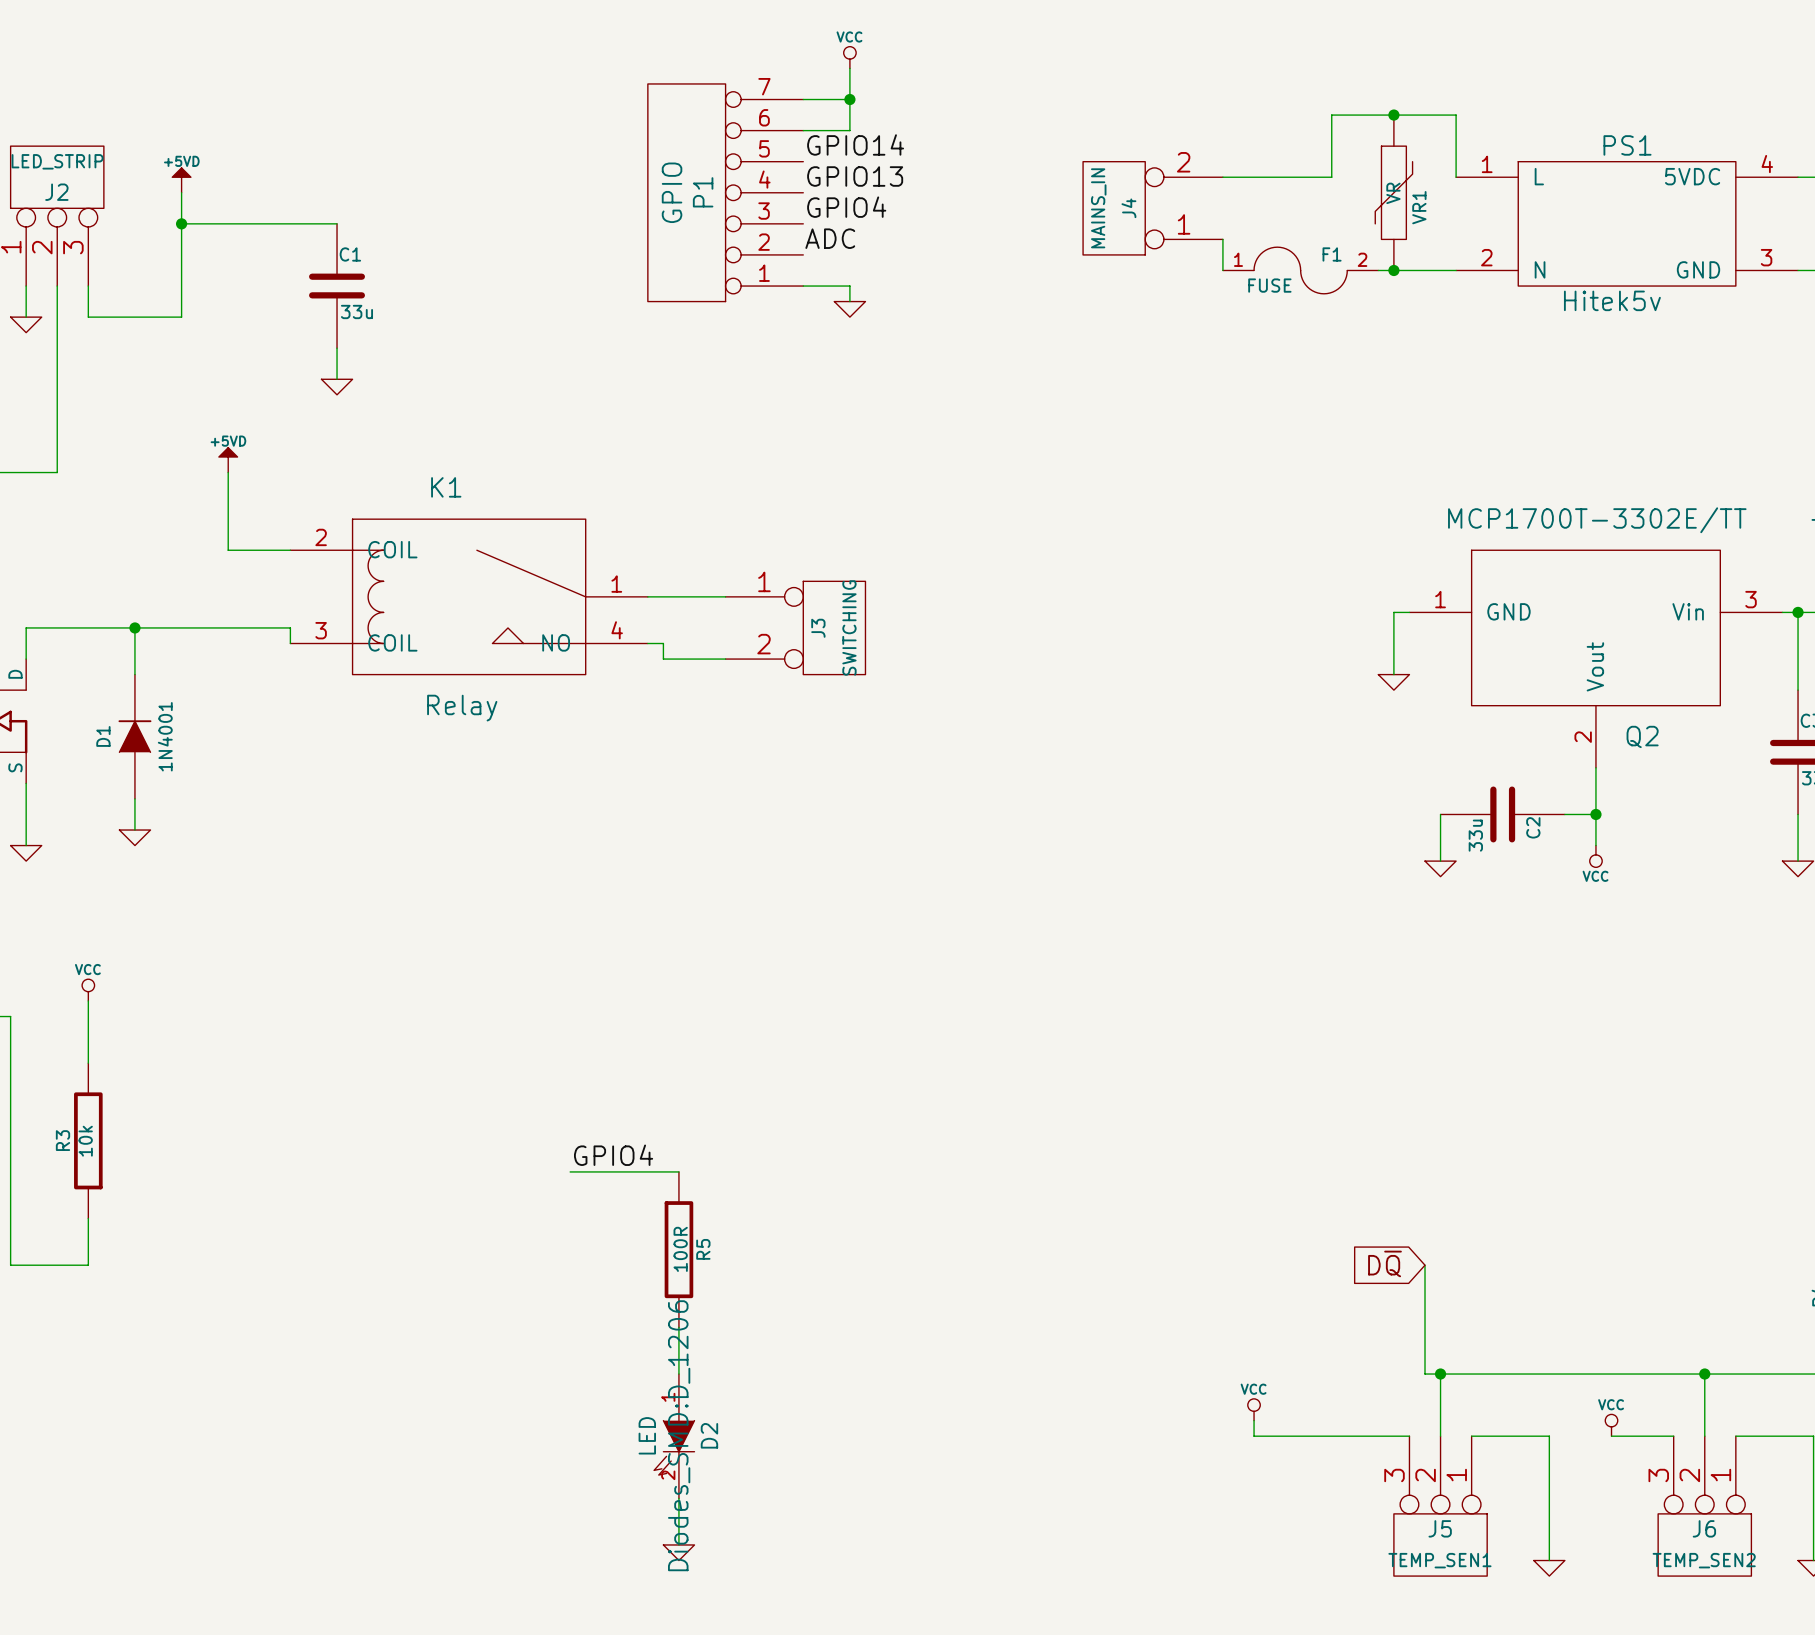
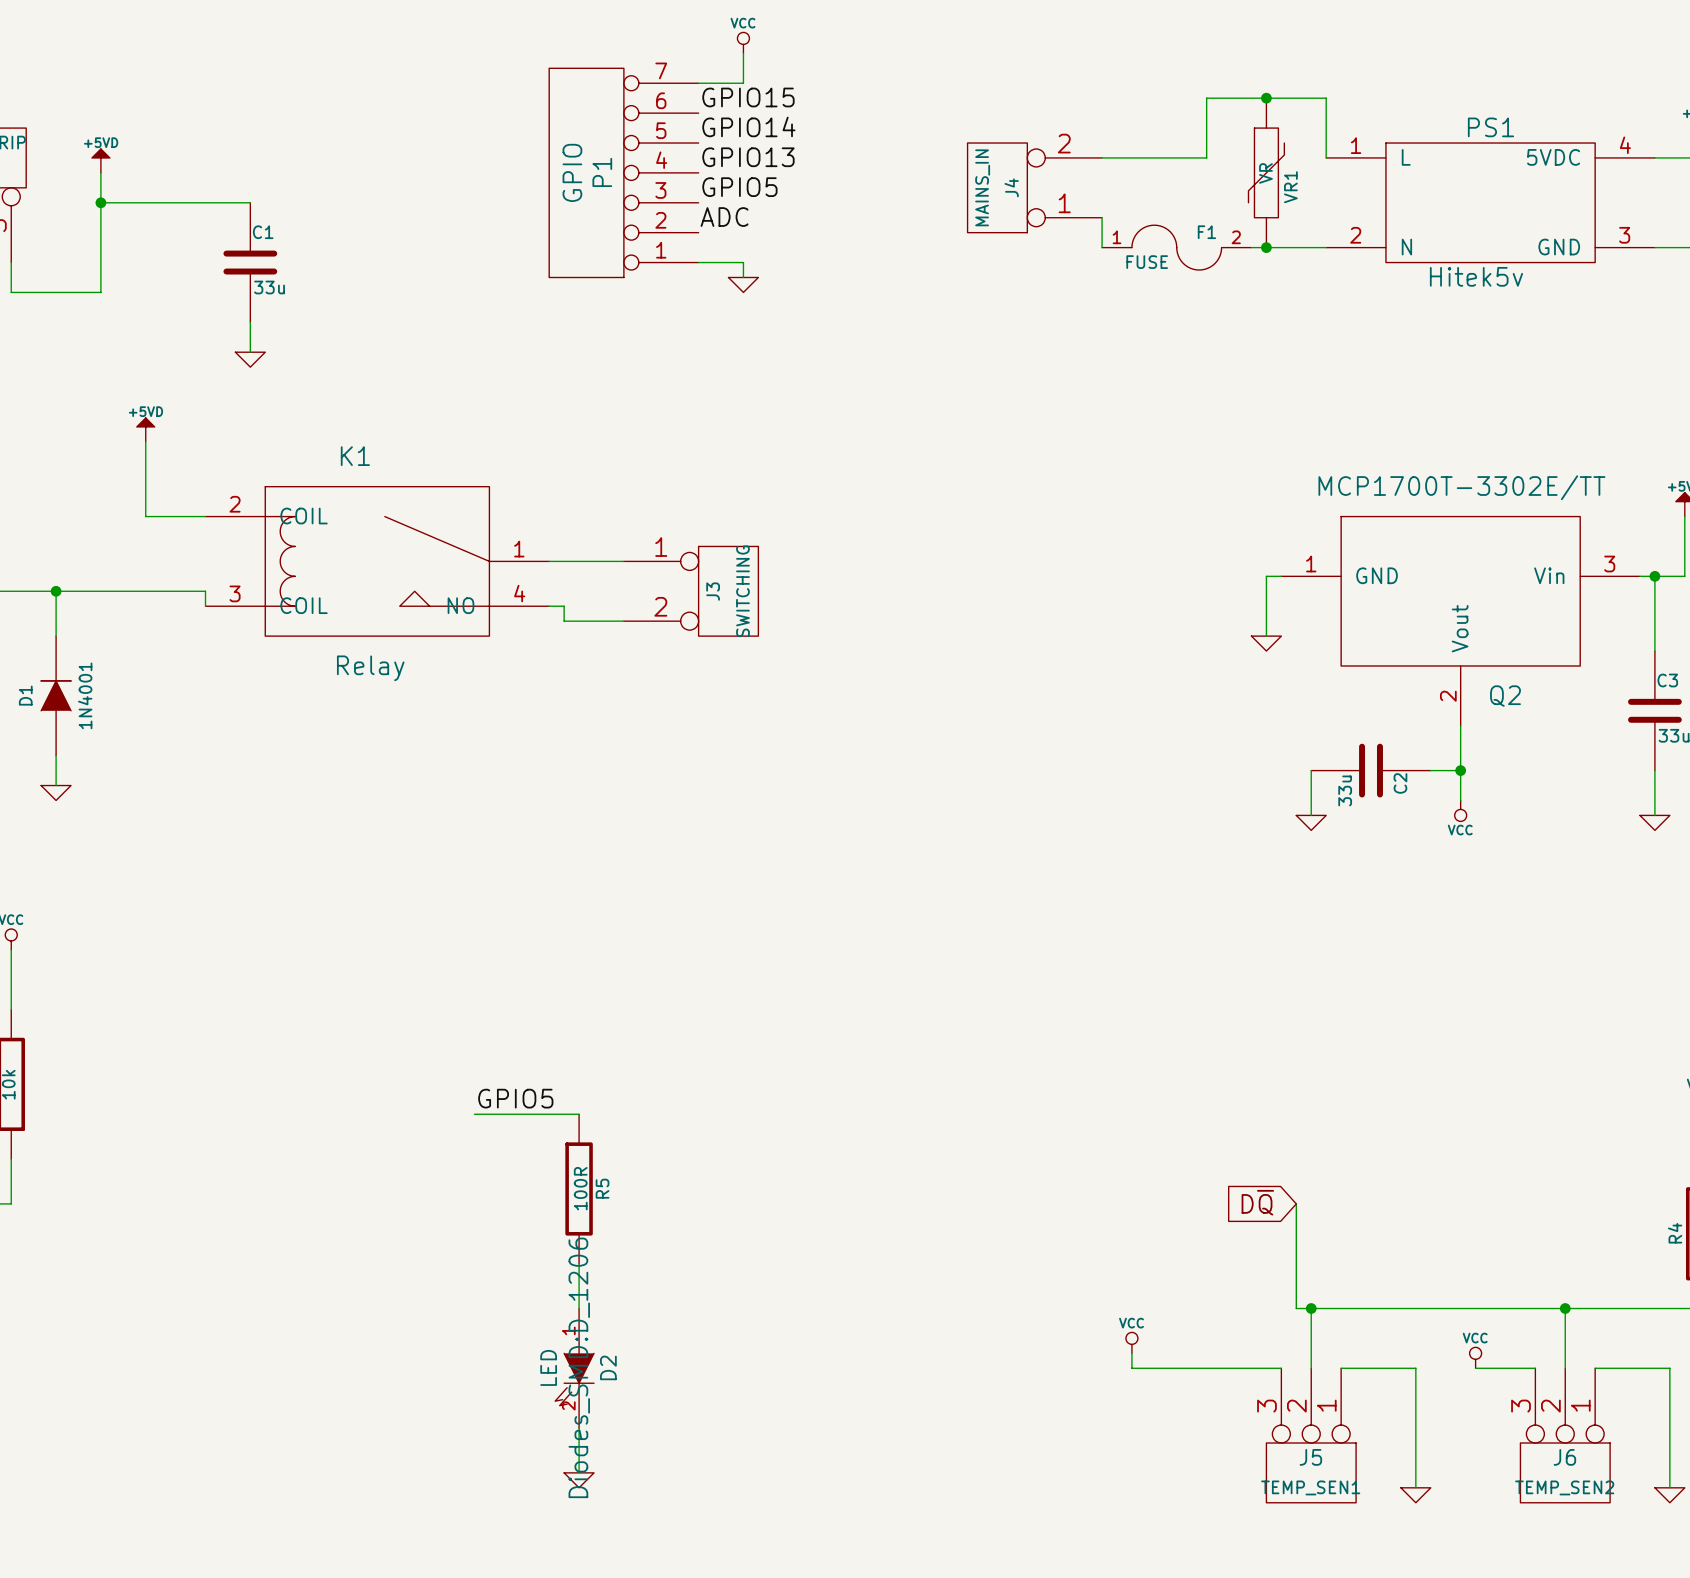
wire: (849, 99) (849, 130) (803, 130) -> none
junction: (849, 99) -> none
label: none -> GPIO15 (748, 97)
label: GPIO4 (846, 207) -> GPIO5 (739, 187)
label: GPIO4 (613, 1155) -> GPIO5 (515, 1098)

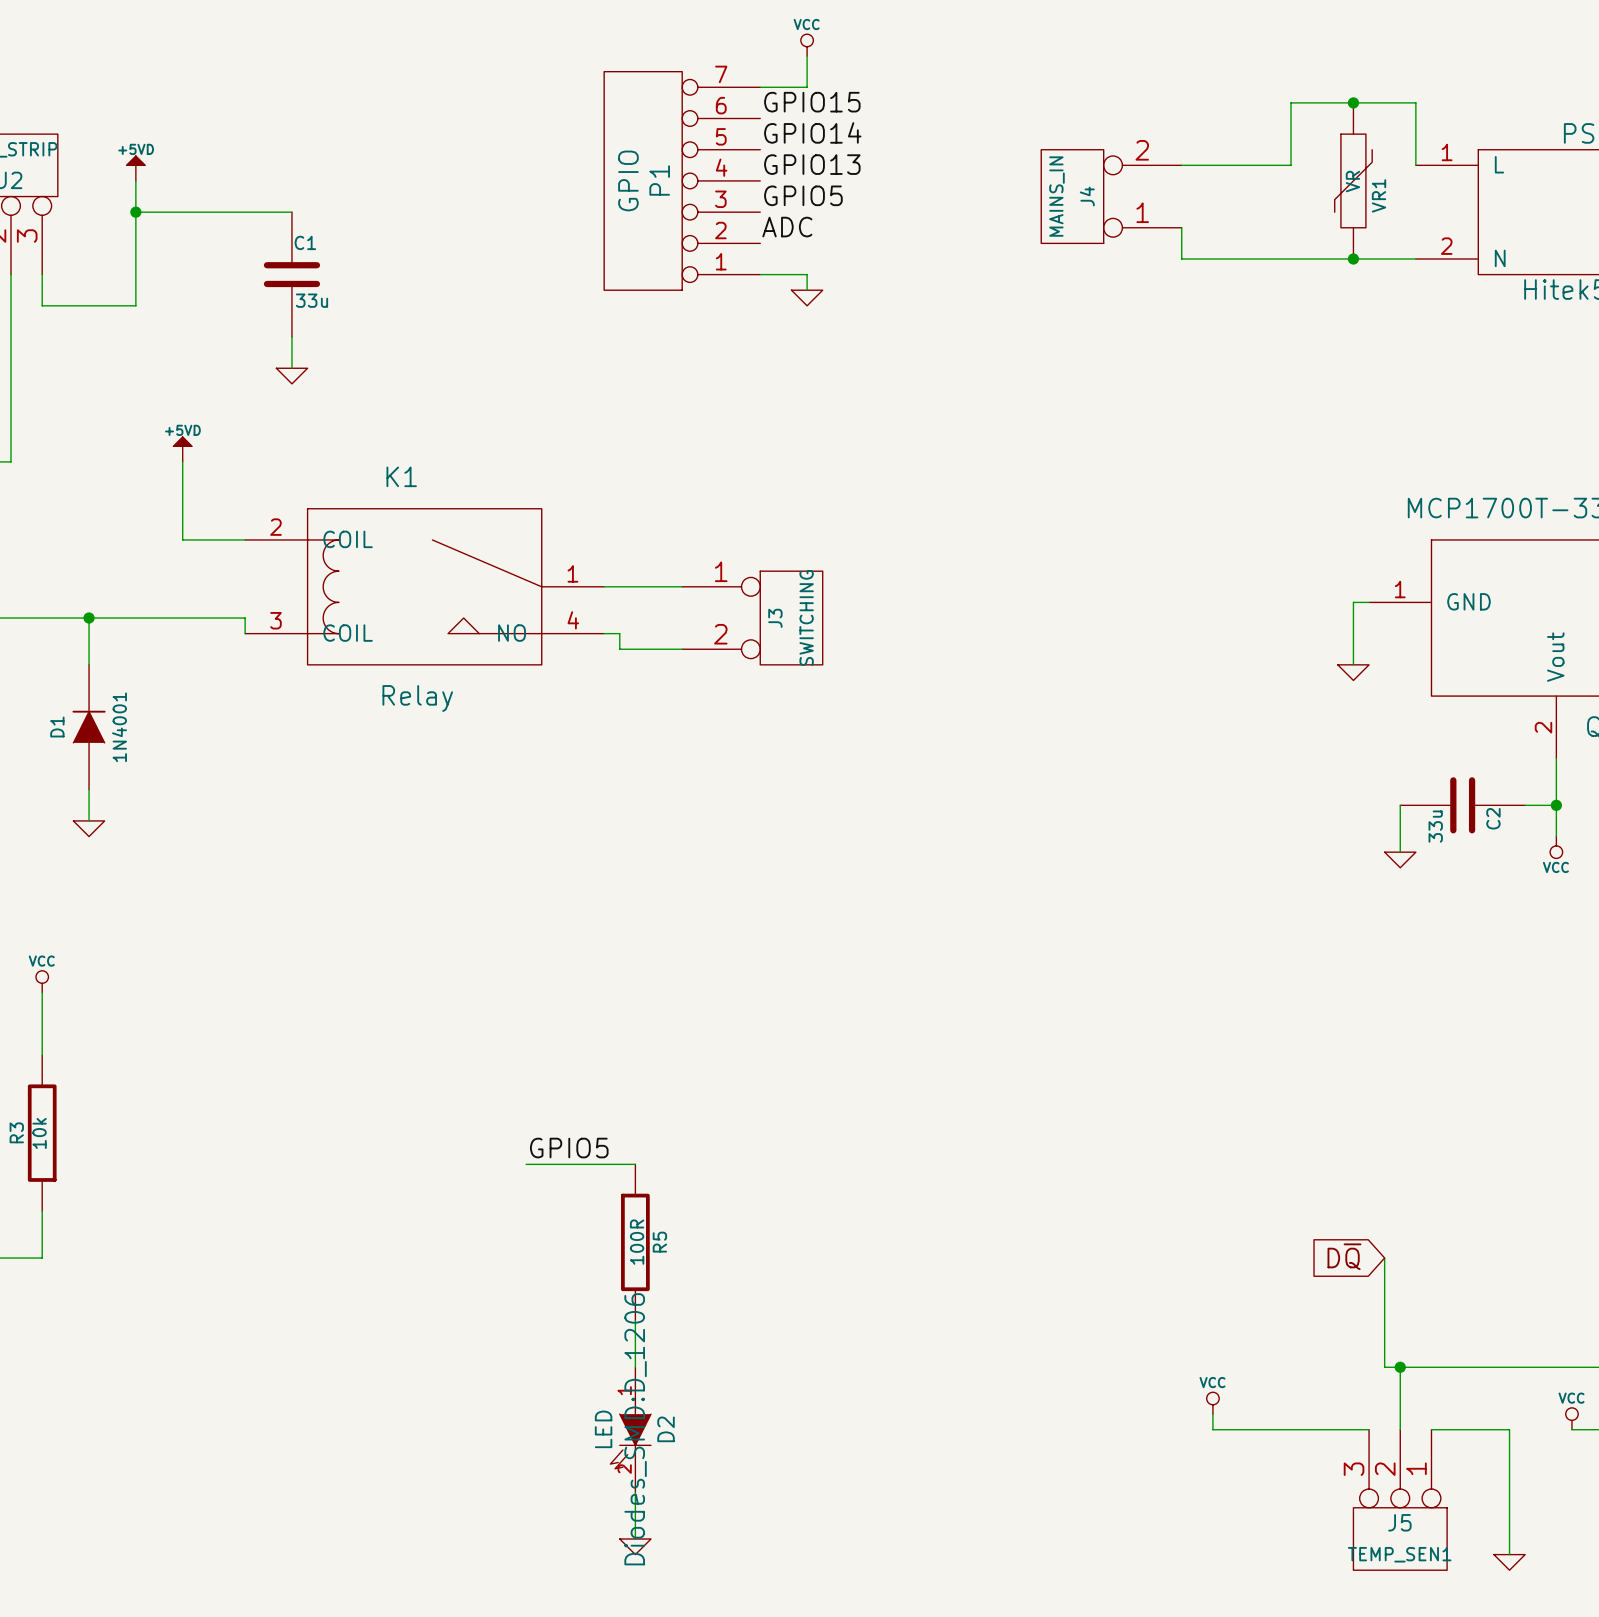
wire: none -> (1181, 258) (1337, 258)
F1: FUSE (1176, 247) -> none

